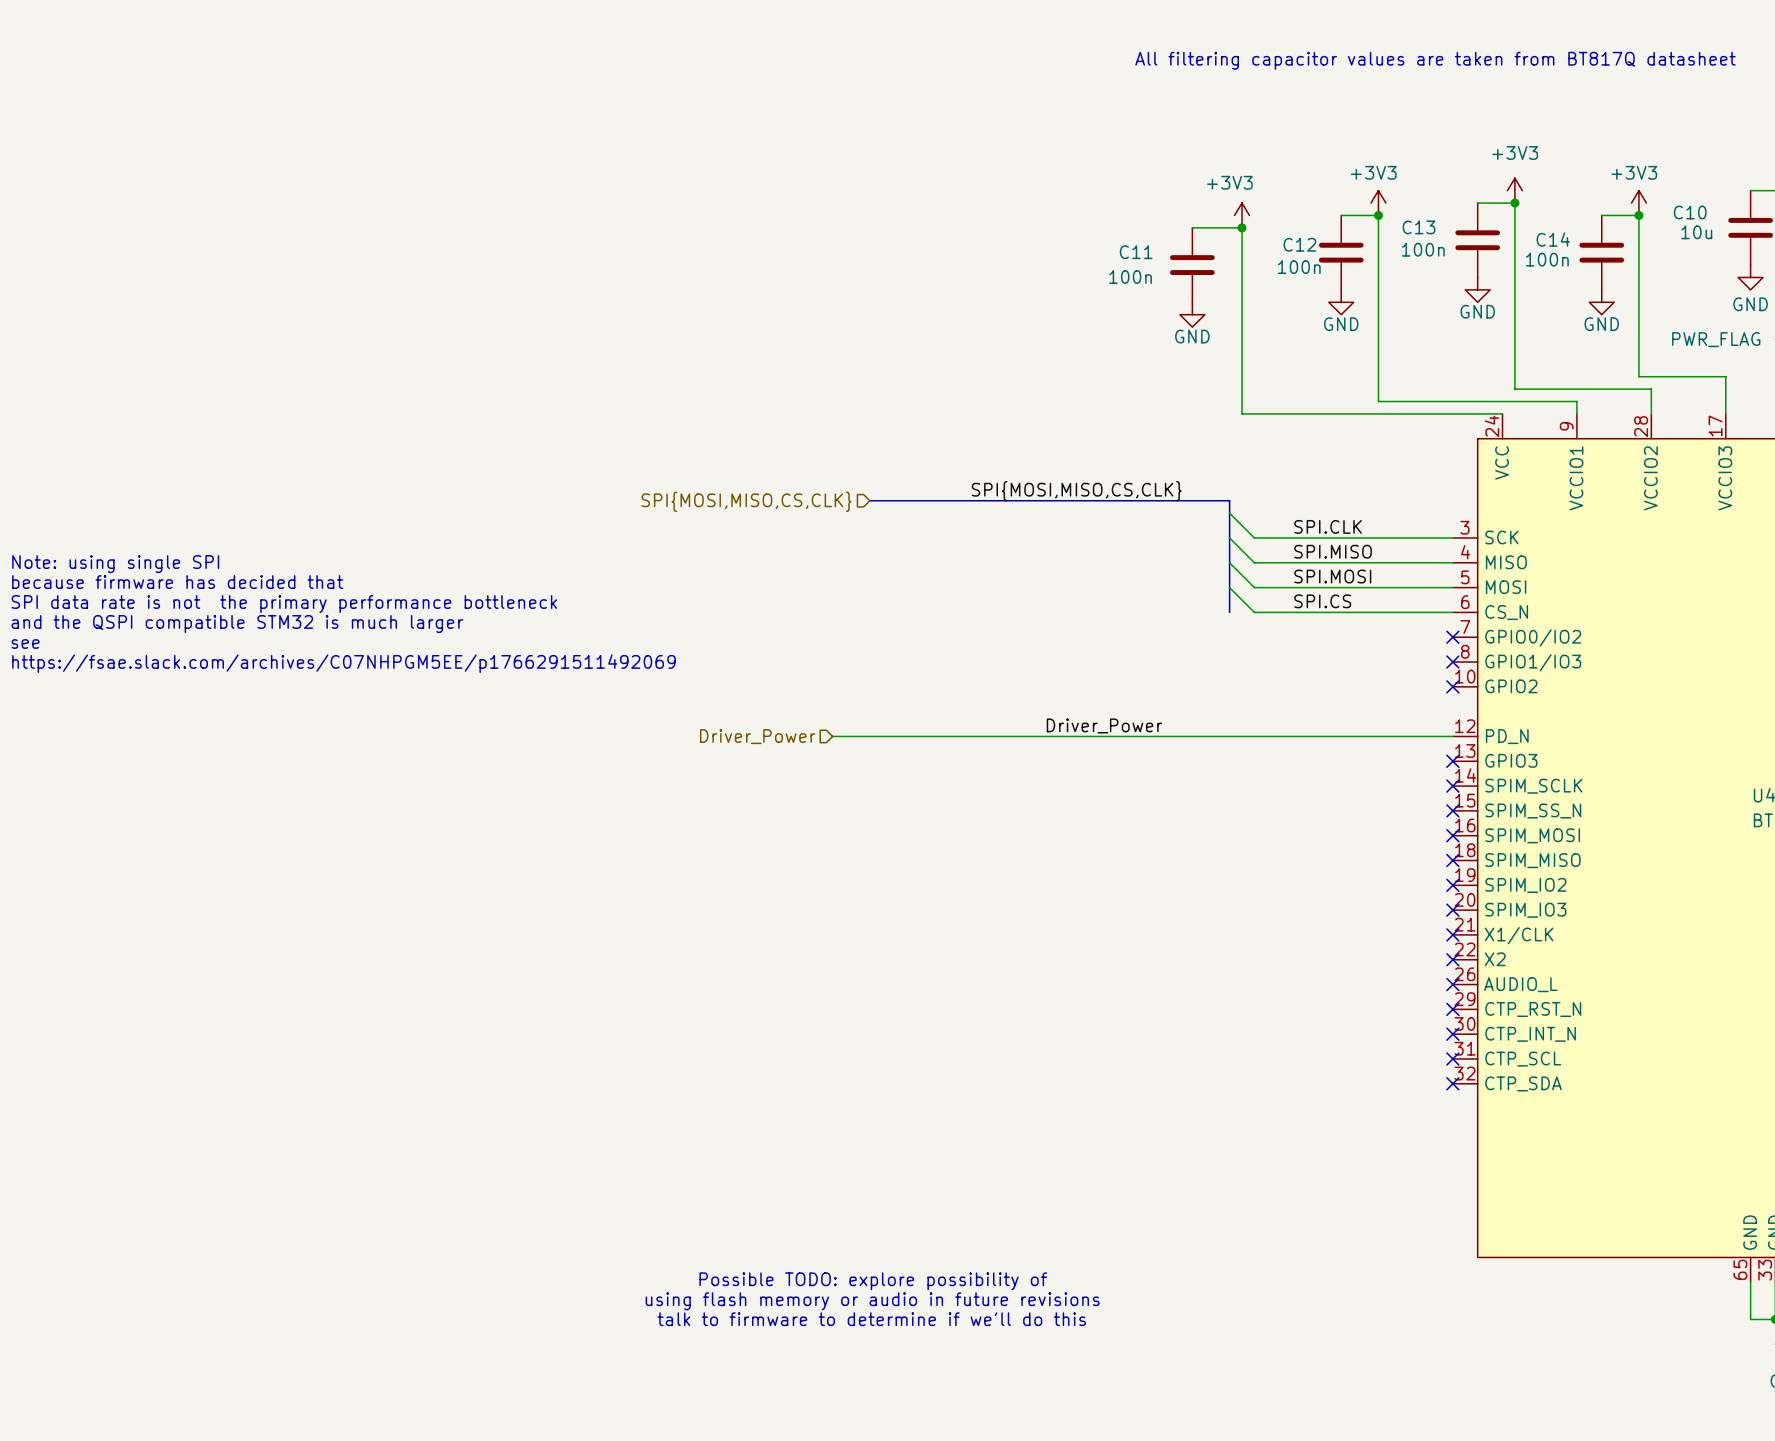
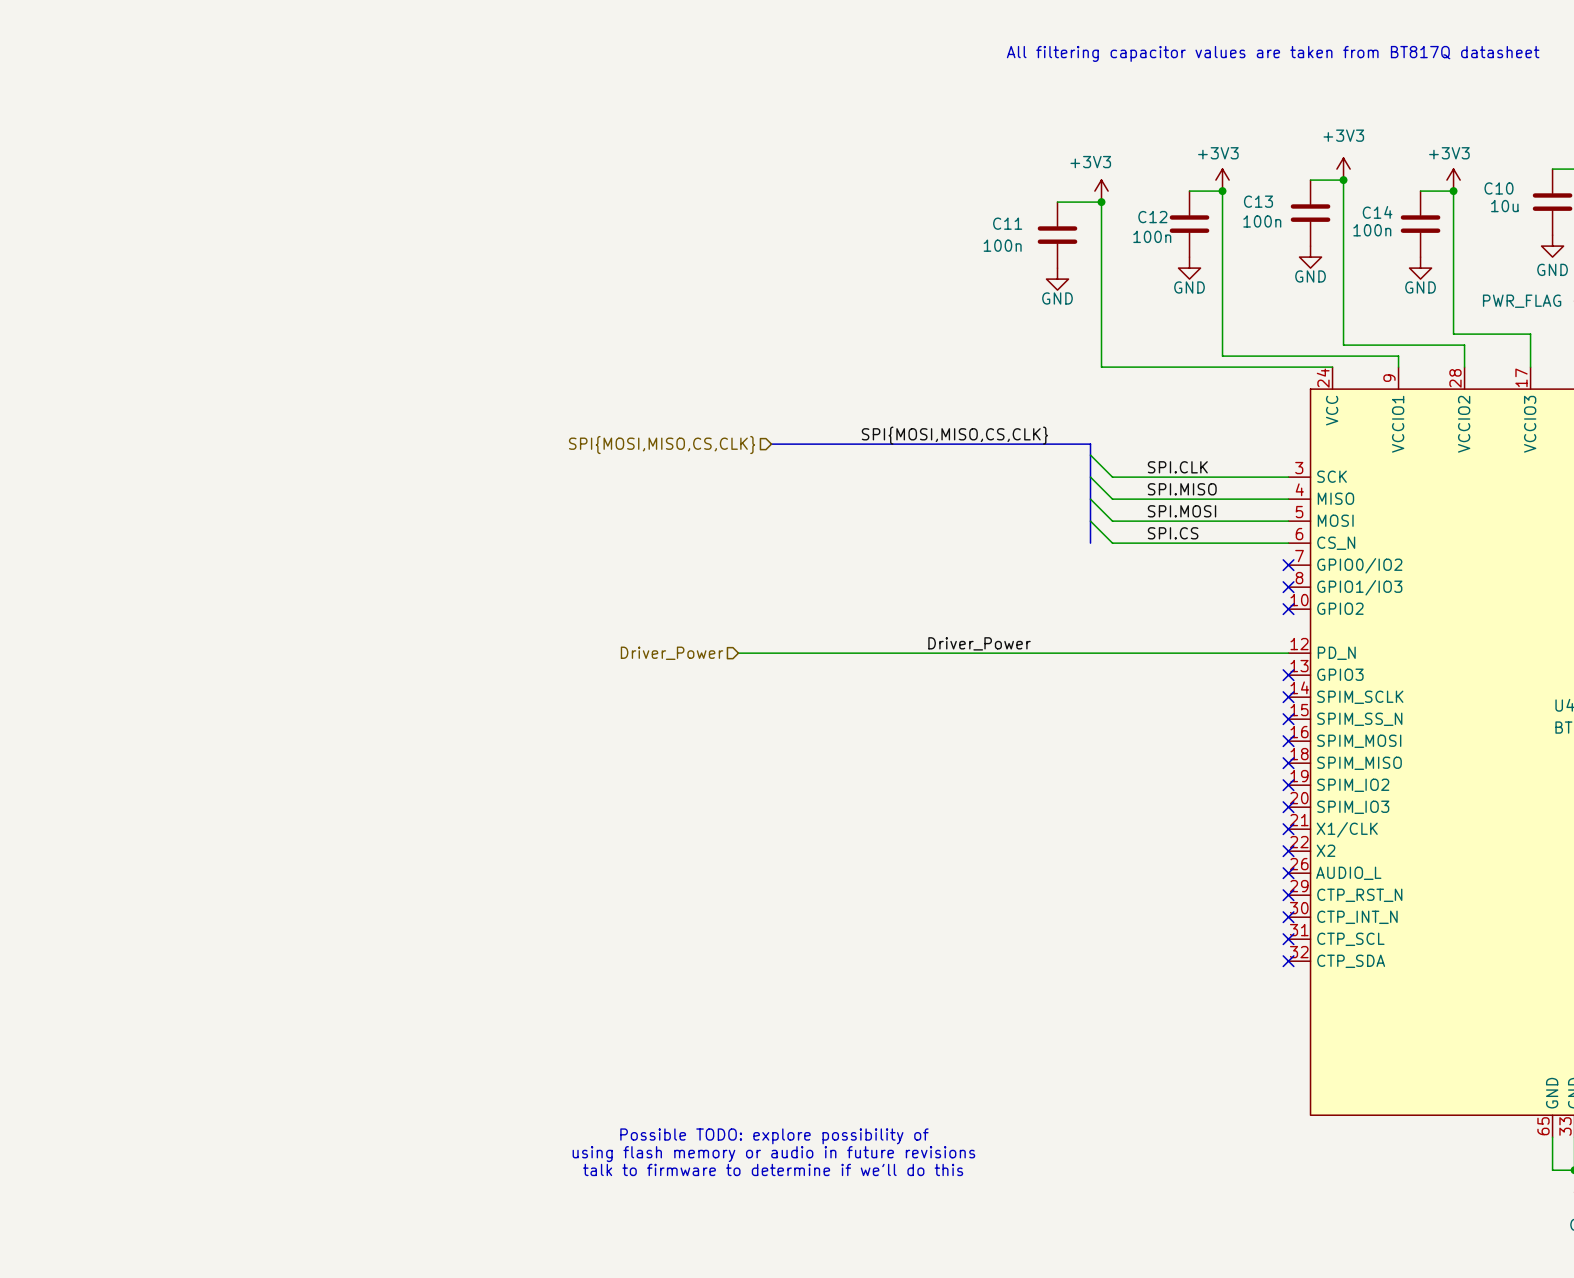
text: Note: using single SPI (115, 564) -> none
text: because firmware has decided that (177, 582) -> none
text: SPI data rate is not the primary performance bottleneck (284, 604) -> none
text: and the QSPI compatible STM32 is much larger (237, 624) -> none
text: see (25, 644) -> none
text: https://fsae.slack.com/archives/C07NHPGM5EE/p1766291511492069 (343, 663) -> none

